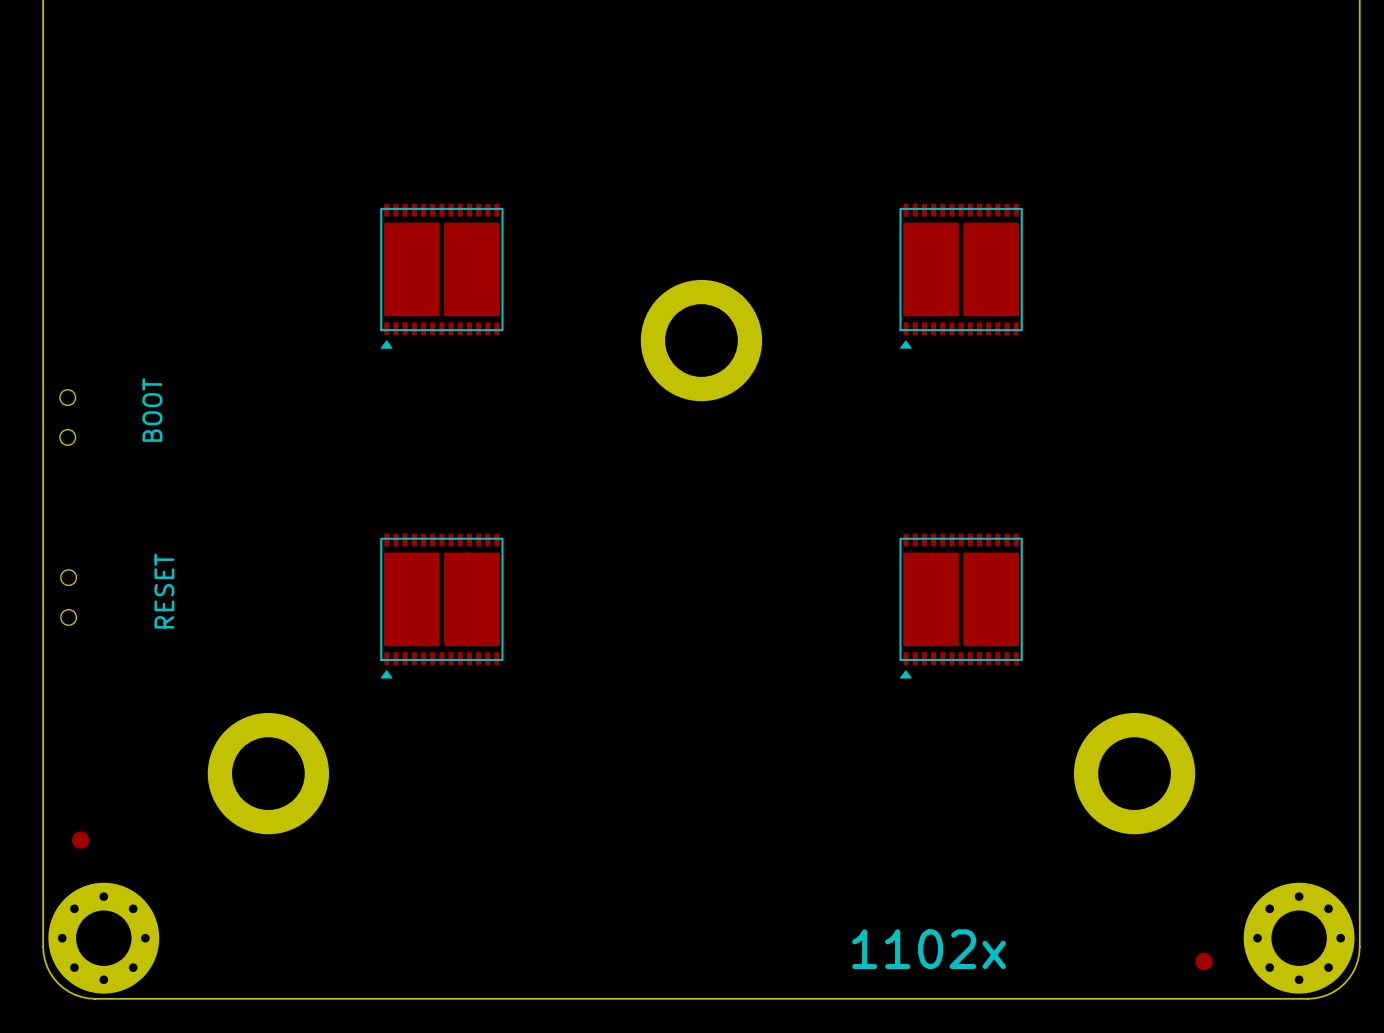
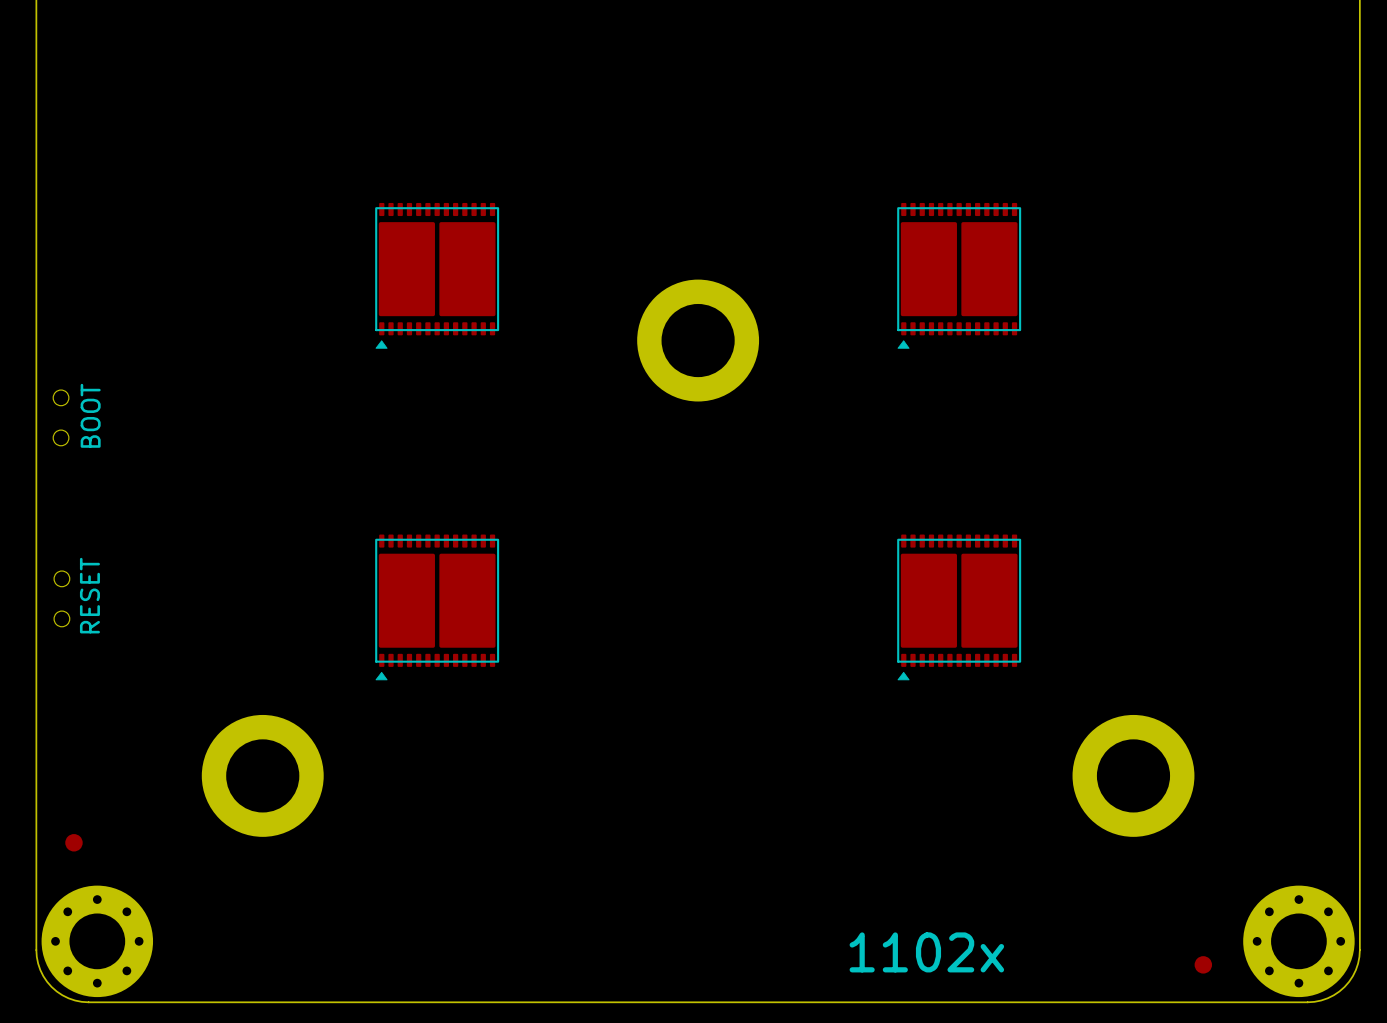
text position: BOOT (152, 410) -> BOOT (90, 415)
text position: RESET (164, 591) -> RESET (89, 595)

